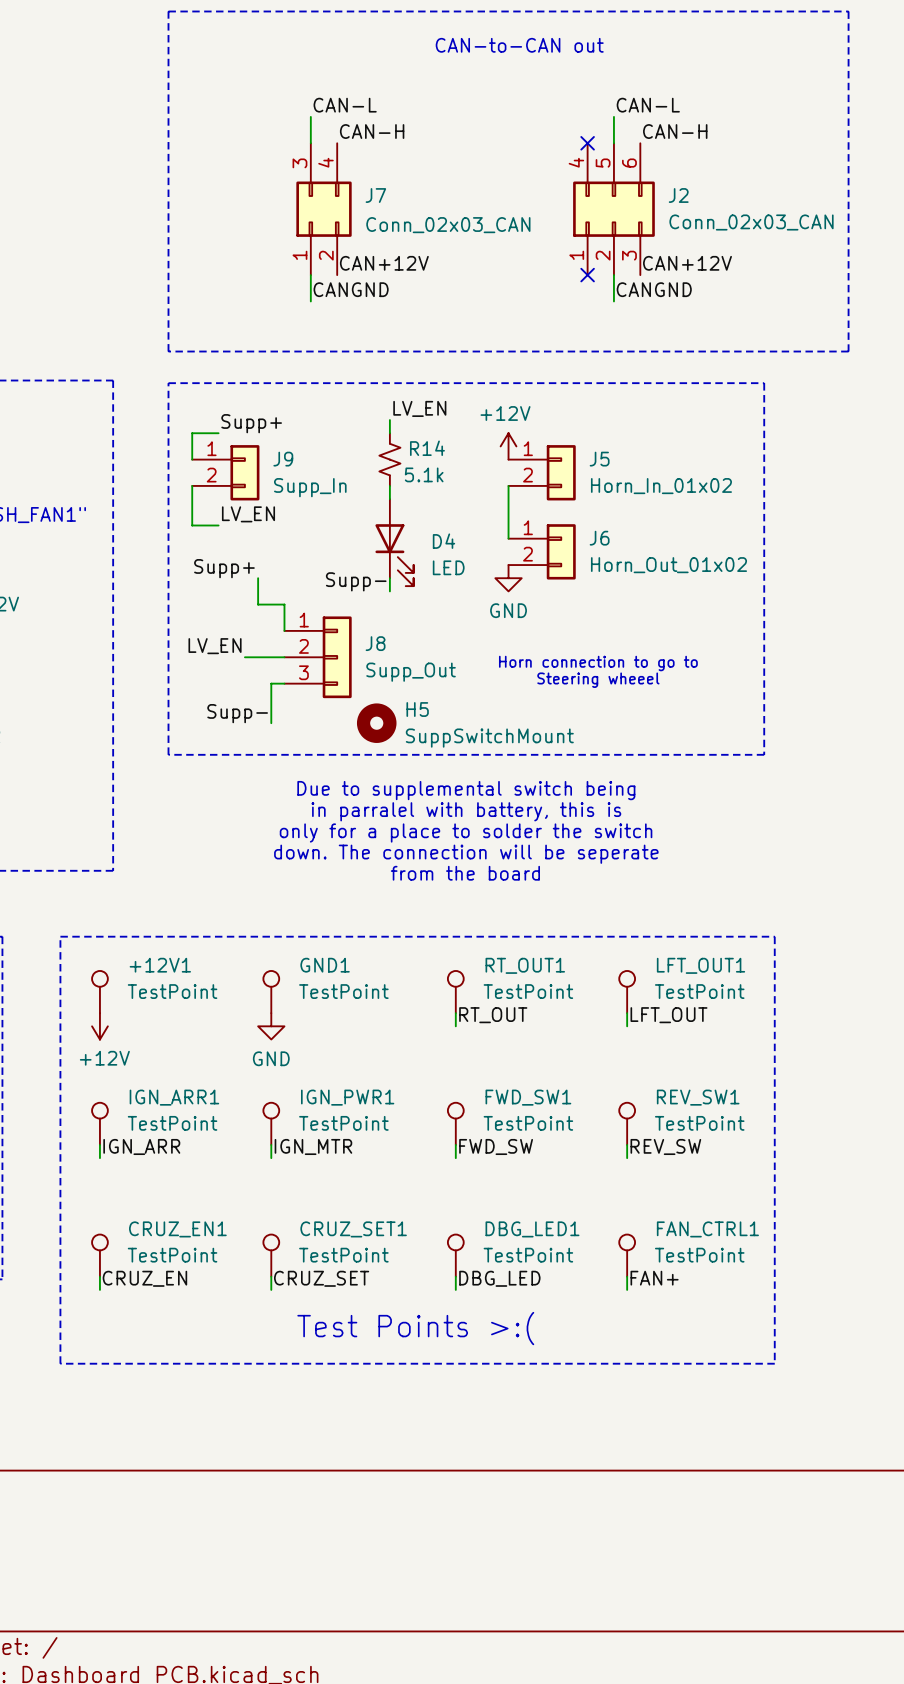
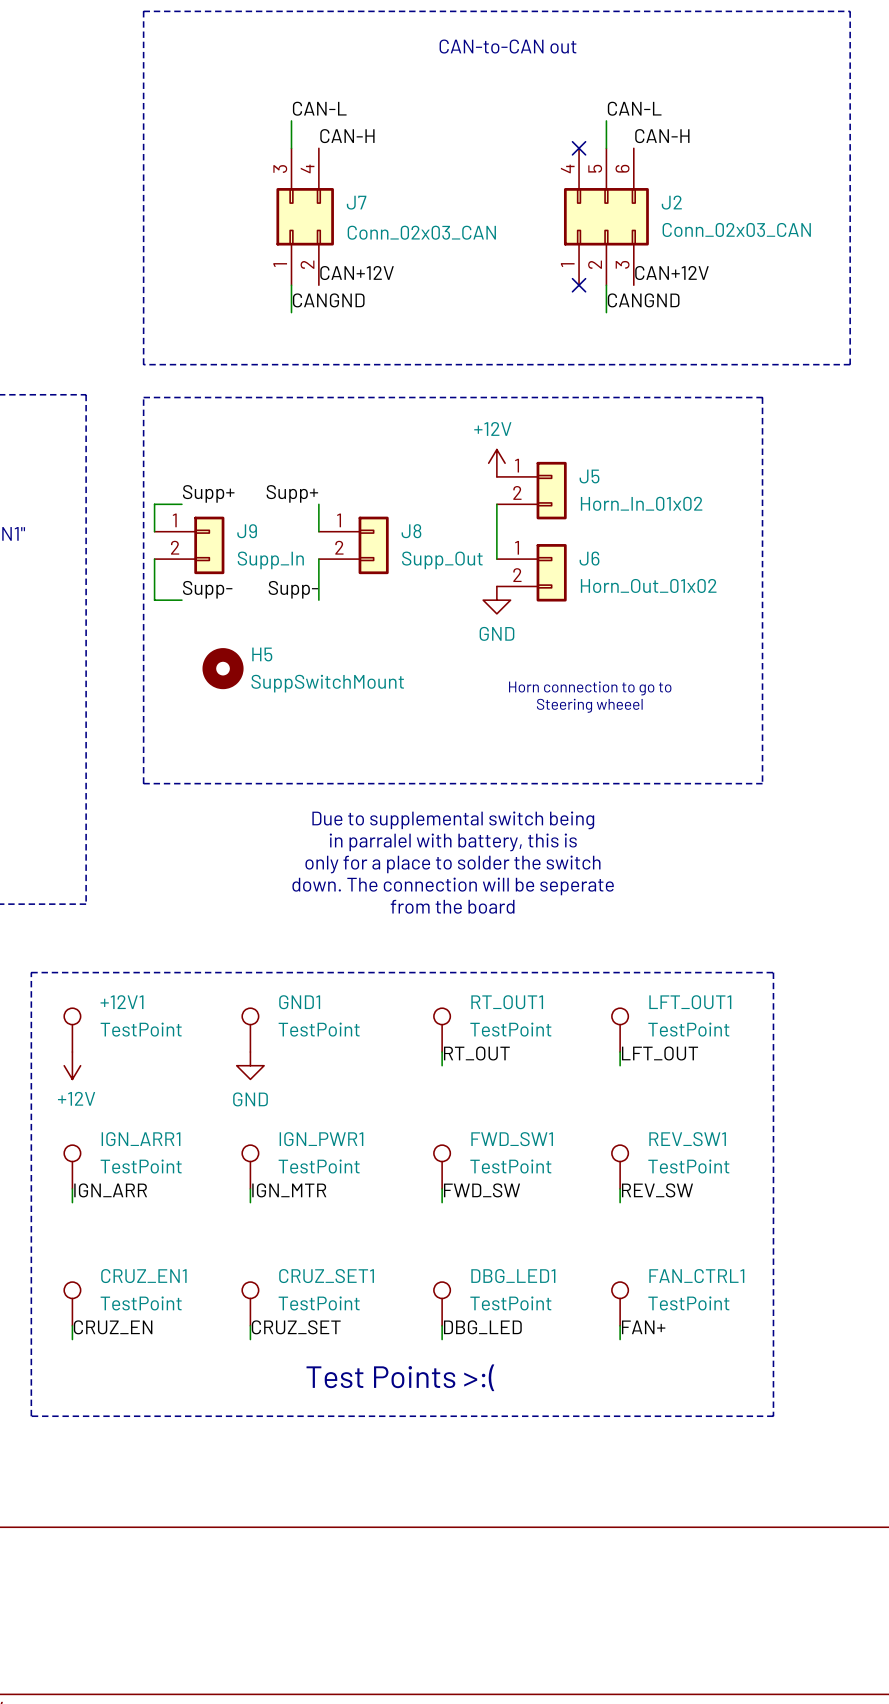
label: LV_EN (419, 408) -> none
wire: (389, 420) (389, 433) -> none
label: Supp+ (251, 423) -> none
wire: (218, 433) (192, 433) (192, 459) -> (181, 504) (154, 504) (154, 531)
R14: 5.1k (389, 459) -> none
J9 position: (225, 472) -> (189, 545)
label: none -> Supp+ (208, 493)
label: none -> Supp+ (292, 493)
wire: (192, 485) (192, 525) (218, 525) -> (154, 559) (154, 600) (181, 600)
wire: none -> (318, 504) (318, 531)
wire: (389, 485) (389, 499) -> none
label: LV_EN (248, 514) -> none
wire: none -> (318, 559) (318, 600)
D4: LED (394, 542) -> none
label: Supp+ (224, 568) -> Supp- (207, 589)
wire: (258, 578) (258, 604) (284, 604) (284, 630) -> none
wire: (389, 578) (389, 591) -> none
label position: Supp- (356, 581) -> Supp- (293, 589)
J8 symbol: [284, 616, 352, 699] -> [318, 516, 389, 575]
label: LV_EN (215, 646) -> none
wire: (244, 657) (284, 657) -> none
wire: (284, 683) (271, 683) (271, 723) -> none
label: Supp- (237, 713) -> none
H5 position: (376, 723) -> (223, 668)

